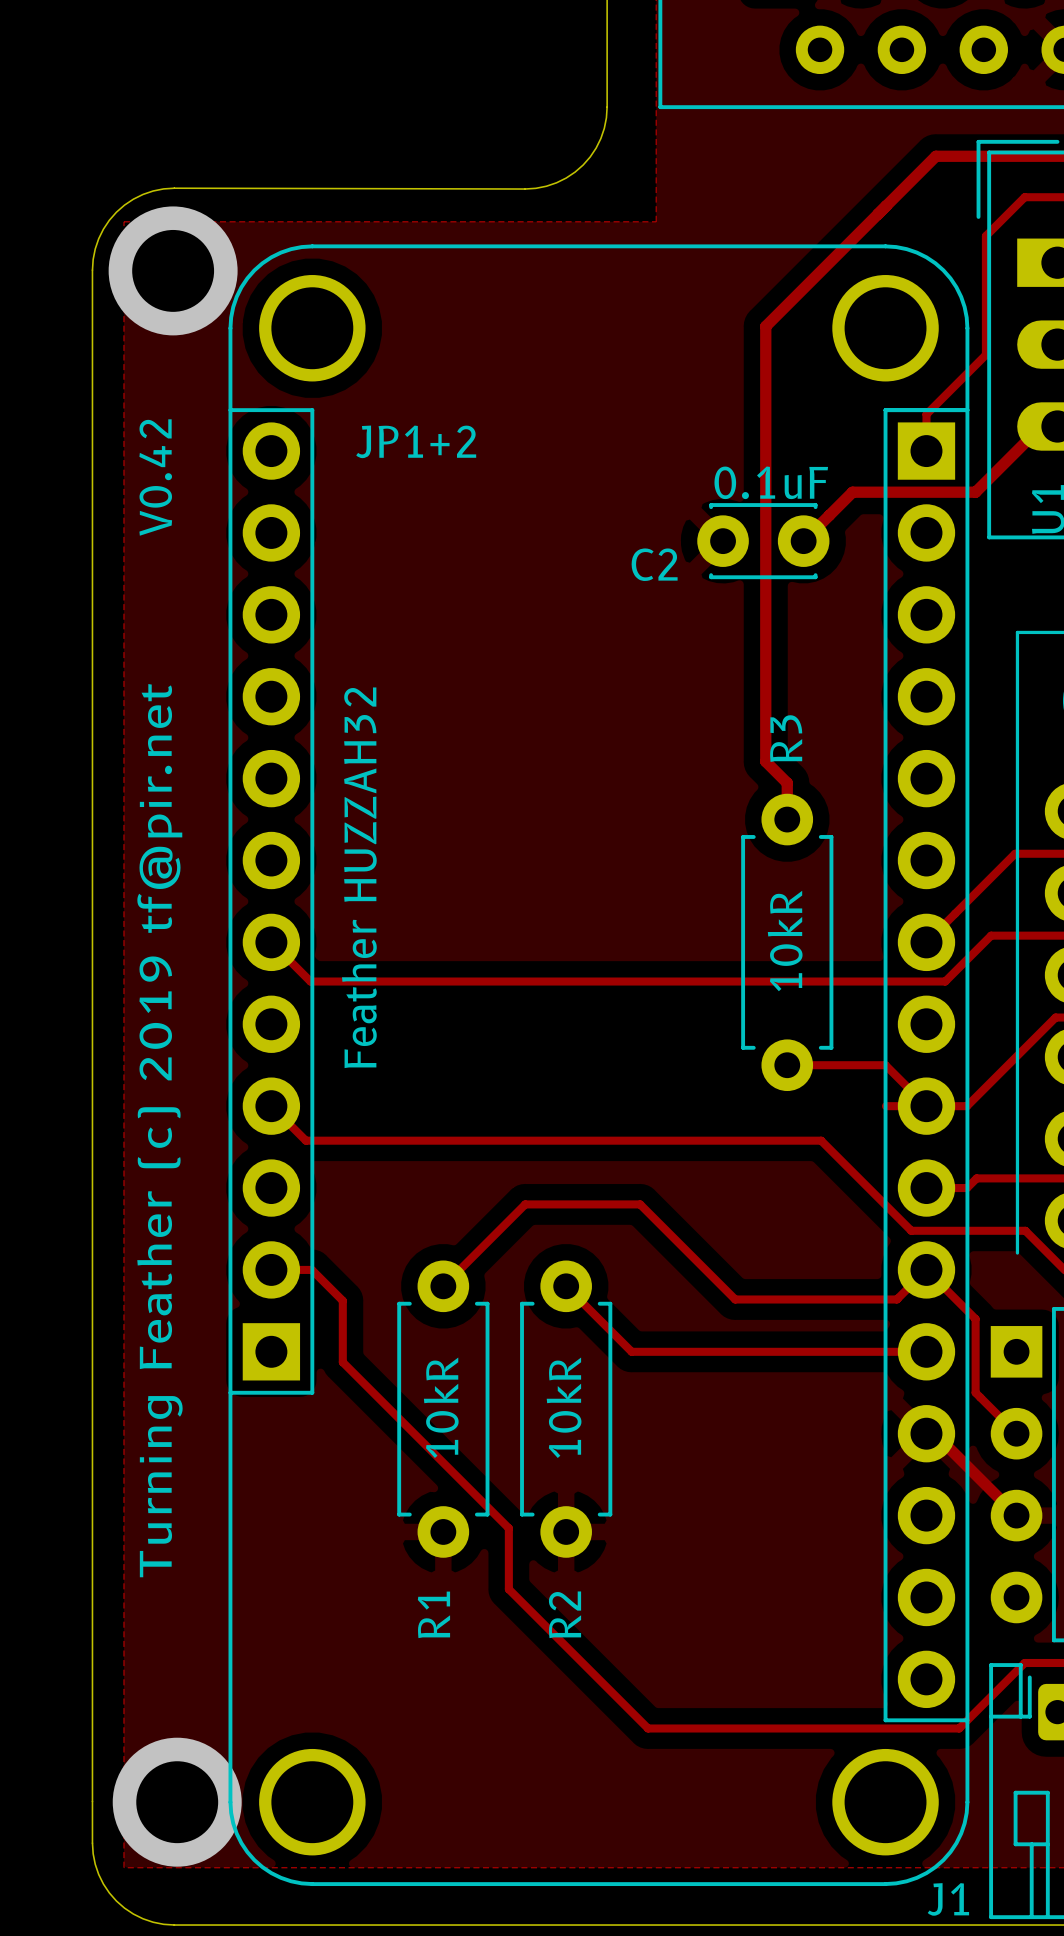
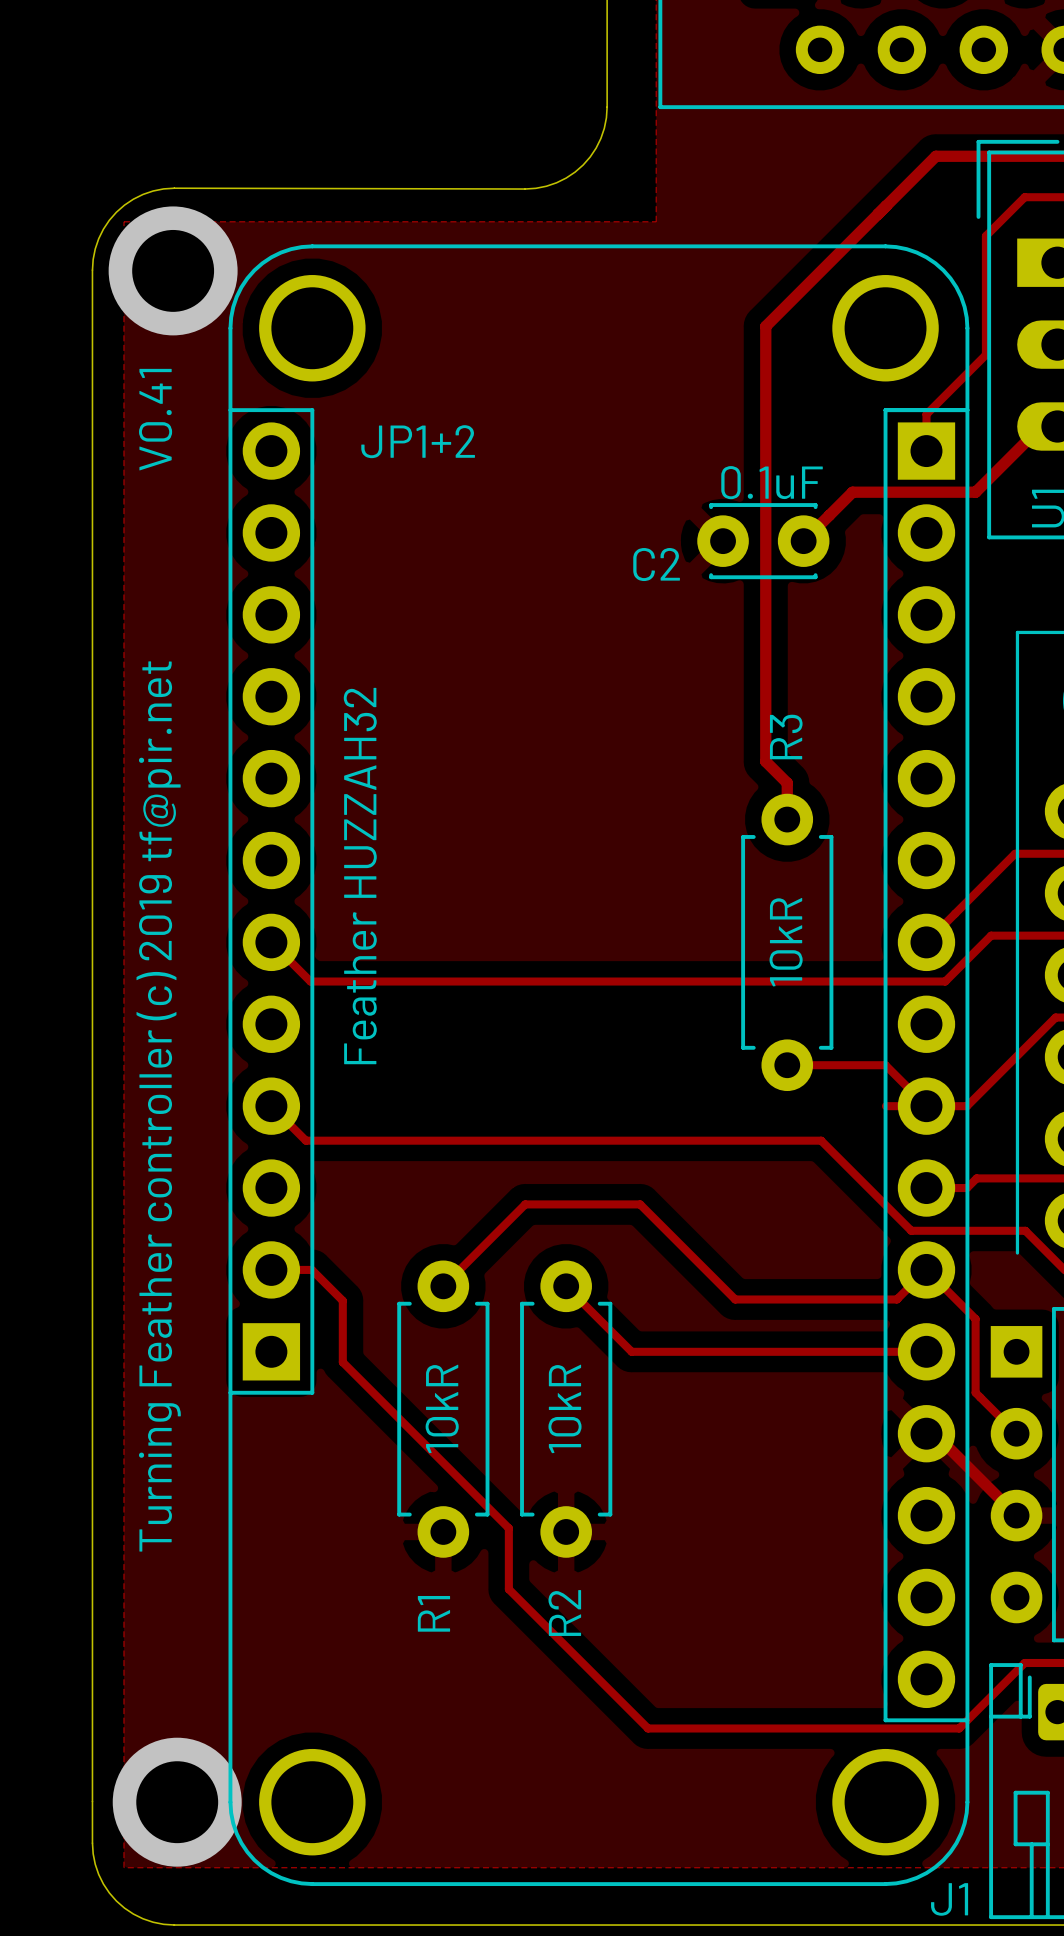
text: V0.42 (155, 477) -> V0.41 (155, 419)
text: Turning Feather (c) 2019 tf@pir.net (159, 1130) -> Turning Feather controller (c) 2019 tf@pir.net (158, 1106)

